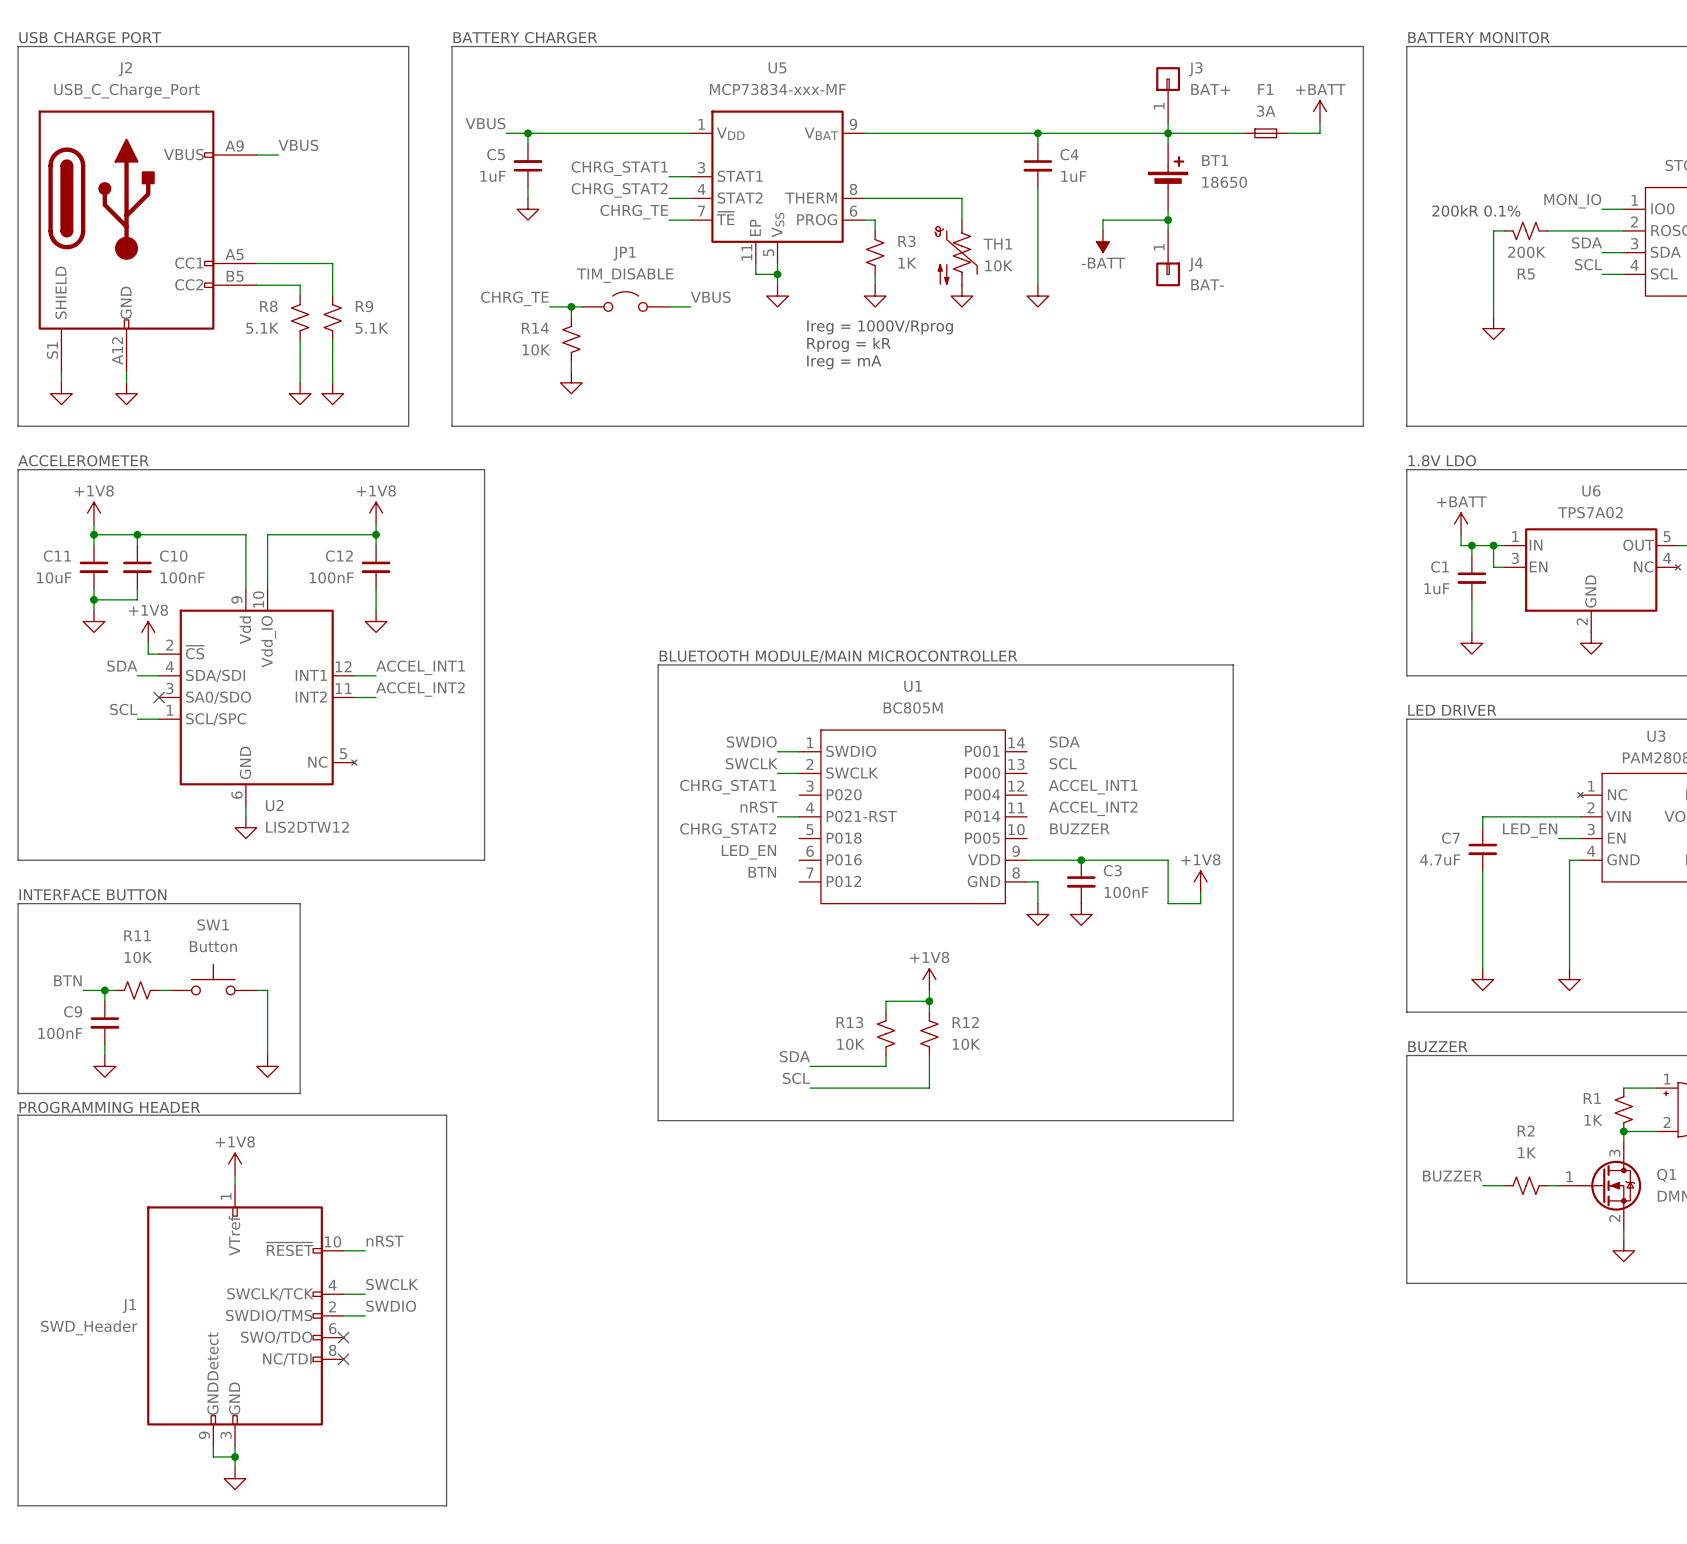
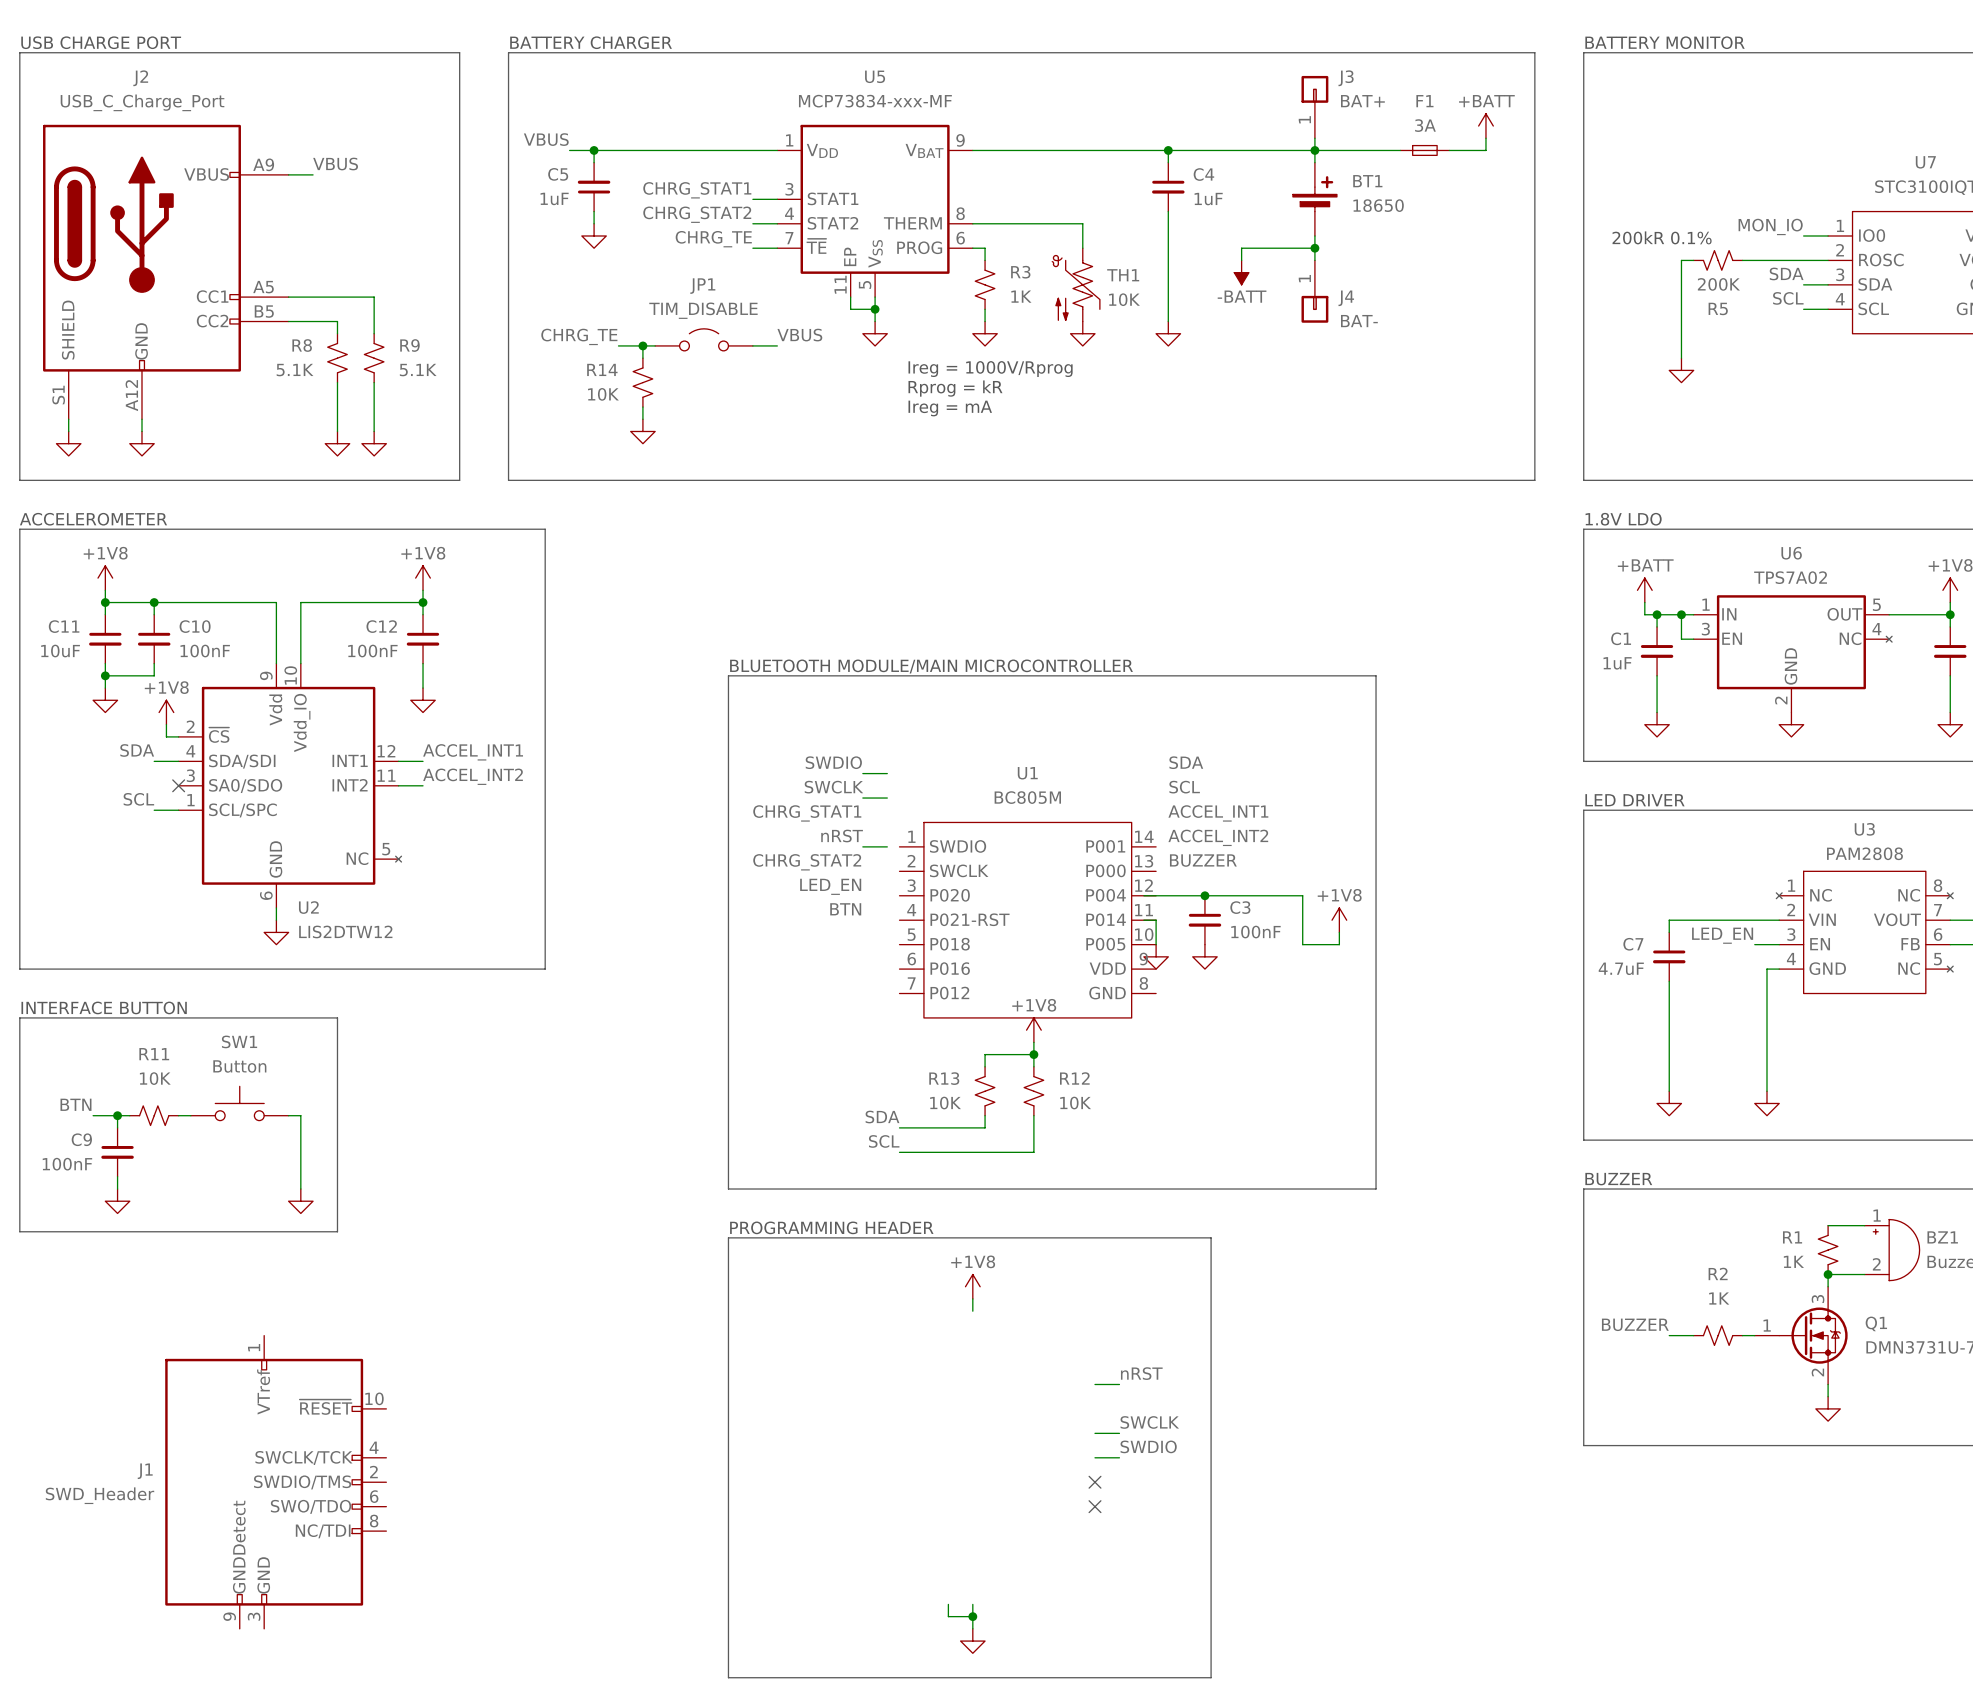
text position: BLUETOOTH MODULE/MAIN MICROCONTROLLER (838, 656) -> BLUETOOTH MODULE/MAIN MICROCONTROLLER (931, 666)
line: (658, 664) (1233, 664) (1233, 1120) (658, 1120) (658, 664) -> (728, 675) (1376, 675) (1376, 1189) (728, 1189) (728, 675)
label position: SWDIO (751, 742) -> SWDIO (833, 762)
label position: SDA (1064, 742) -> SDA (1186, 762)
wire: (788, 751) (799, 751) -> (862, 846) (875, 846)
label position: SWCLK (751, 763) -> SWCLK (833, 787)
label position: SCL (1063, 763) -> SCL (1184, 787)
wire: (777, 773) (799, 773) -> (862, 798) (887, 798)
label position: CHRG_STAT1 (728, 787) -> CHRG_STAT1 (807, 813)
label position: ACCEL_INT1 (1093, 787) -> ACCEL_INT1 (1218, 813)
junction: none -> (1204, 895)
label position: nRST (759, 807) -> nRST (842, 836)
label position: ACCEL_INT2 (1093, 808) -> ACCEL_INT2 (1218, 837)
wire: (777, 816) (799, 816) -> (862, 773) (887, 773)
label position: BUZZER (1079, 828) -> BUZZER (1203, 860)
label position: CHRG_STAT2 (728, 830) -> CHRG_STAT2 (807, 862)
power symbol: none -> (1156, 956)
power symbol: none -> (1204, 956)
label position: LED_EN (748, 852) -> LED_EN (830, 886)
wire: (1027, 860) (1168, 860) (1168, 903) (1200, 903) (1200, 892) -> (1143, 895) (1302, 895) (1302, 944) (1339, 944) (1339, 932)
junction: (1081, 860) -> none
label position: BTN (762, 872) -> BTN (845, 909)
wire: (1027, 881) (1037, 881) (1037, 903) -> (1143, 920) (1156, 920) (1156, 944)
C3 position: (1081, 881) -> (1204, 920)
power symbol position: +1V8 (1200, 881) -> +1V8 (1339, 920)
power symbol: (1037, 914) -> none
power symbol: (1081, 914) -> none
junction: none -> (1033, 1054)
power symbol position: +1V8 (929, 979) -> +1V8 (1033, 1030)
wire: (929, 990) (929, 1012) -> (1033, 1042) (1033, 1066)
wire: (929, 1001) (886, 1001) (886, 1012) -> (1033, 1054) (985, 1054) (985, 1066)
junction: (929, 1001) -> none
R13 position: (886, 1033) -> (985, 1091)
R12 position: (929, 1033) -> (1033, 1091)
wire: (886, 1055) (886, 1066) (810, 1066) -> (985, 1115) (985, 1127) (899, 1127)
wire: (929, 1055) (929, 1088) (810, 1088) -> (1033, 1115) (1033, 1152) (899, 1152)
label position: SDA (794, 1056) -> SDA (882, 1117)
label position: SCL (796, 1078) -> SCL (884, 1141)
text: none -> PROGRAMMING HEADER (831, 1227)
line: none -> (728, 1237) (1211, 1237) (1211, 1677) (728, 1677) (728, 1237)
text: PROGRAMMING HEADER (109, 1107) -> none
line: (18, 1115) (446, 1115) (446, 1505) (18, 1505) (18, 1115) -> none
power symbol: none -> +1V8 (972, 1286)
wire: none -> (972, 1298) (972, 1311)
power symbol: +1V8 (235, 1164) -> none
wire: (235, 1174) (235, 1185) -> none
label: none -> nRST (1141, 1373)
wire: none -> (1095, 1384) (1119, 1384)
label: nRST (385, 1241) -> none
wire: (343, 1250) (365, 1250) -> none
label: none -> SWCLK (1149, 1422)
wire: none -> (1095, 1433) (1119, 1433)
label: SWCLK (392, 1284) -> none
label: none -> SWDIO (1148, 1446)
wire: (343, 1294) (365, 1294) -> none
wire: none -> (1095, 1457) (1119, 1457)
label: SWDIO (391, 1306) -> none
wire: (343, 1315) (365, 1315) -> none
no-connect mark: none -> (1095, 1482)
no-connect mark: (343, 1337) -> none
no-connect mark: none -> (1095, 1506)
no-connect mark: (343, 1359) -> none
wire: none -> (948, 1604) (948, 1616) (972, 1616)
wire: none -> (972, 1604) (972, 1628)
junction: none -> (972, 1616)
wire: (213, 1446) (213, 1456) (235, 1456) -> none
wire: (235, 1446) (235, 1467) -> none
junction: (235, 1456) -> none
power symbol: none -> (972, 1641)
power symbol: (235, 1478) -> none

